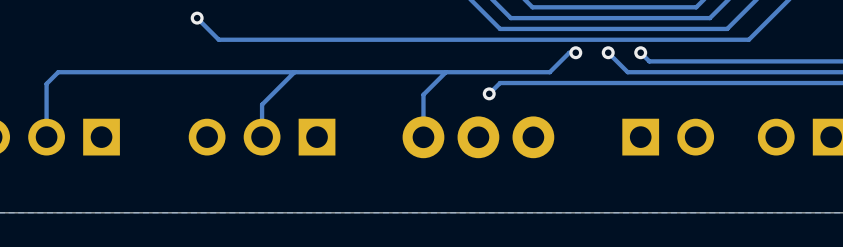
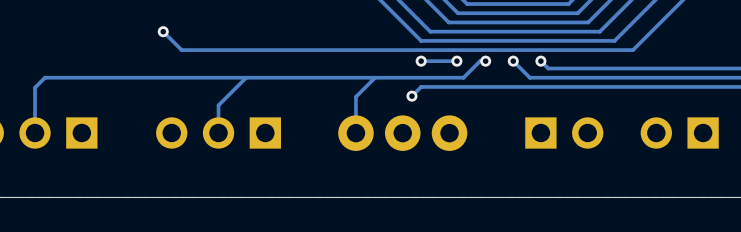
via: none -> (421, 61)
track: none -> (456, 61) (421, 61)
via: none -> (456, 61)

